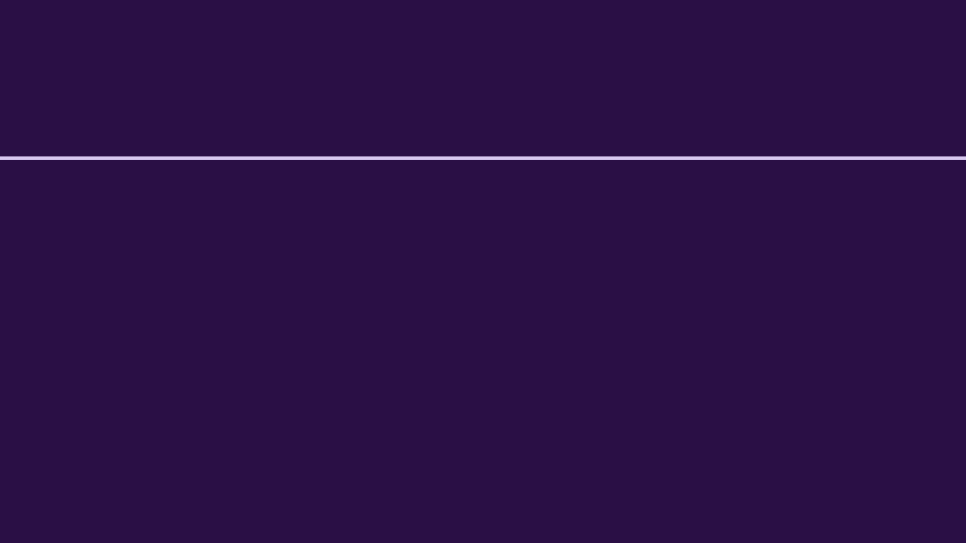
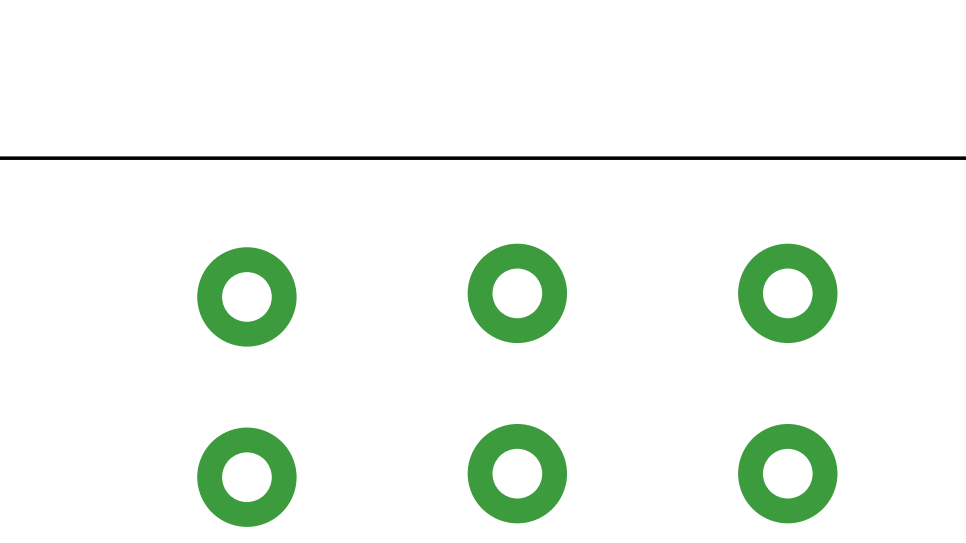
part: none -> (517, 383)
part: none -> (787, 383)
part: none -> (246, 387)

